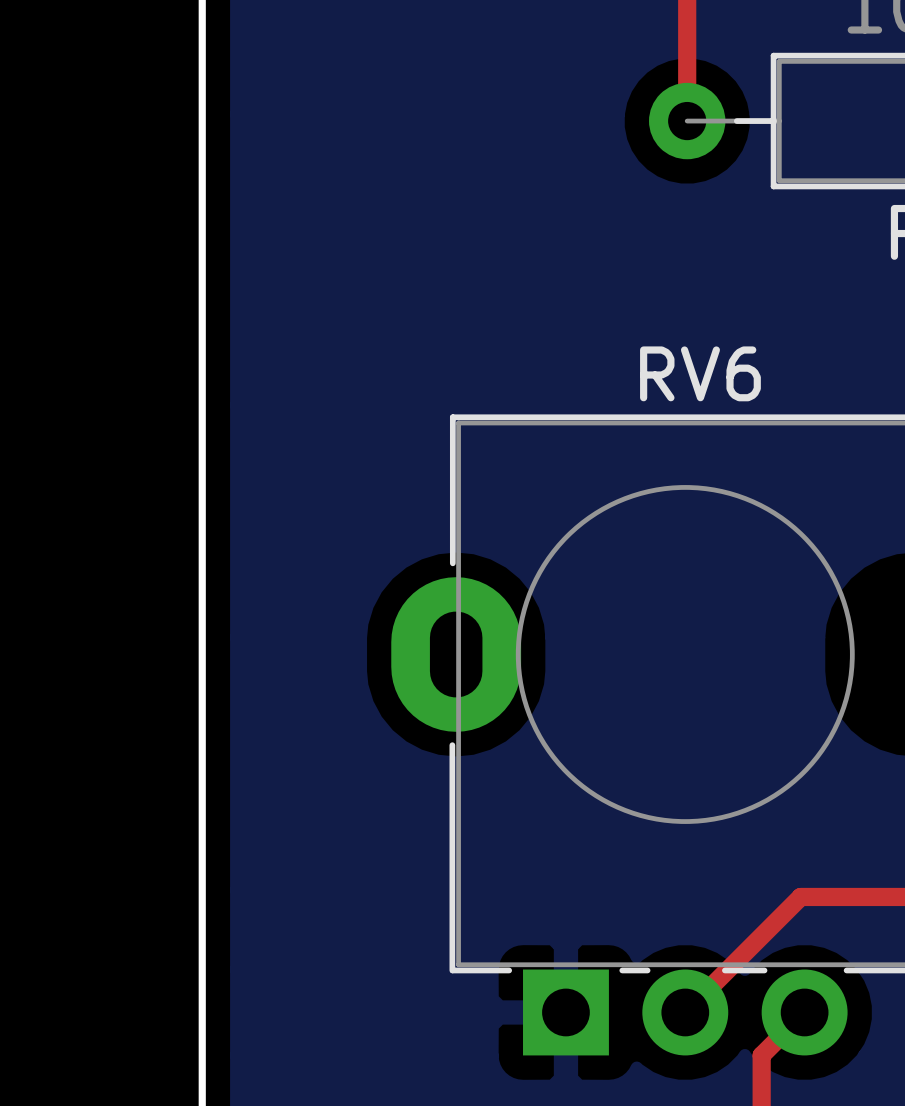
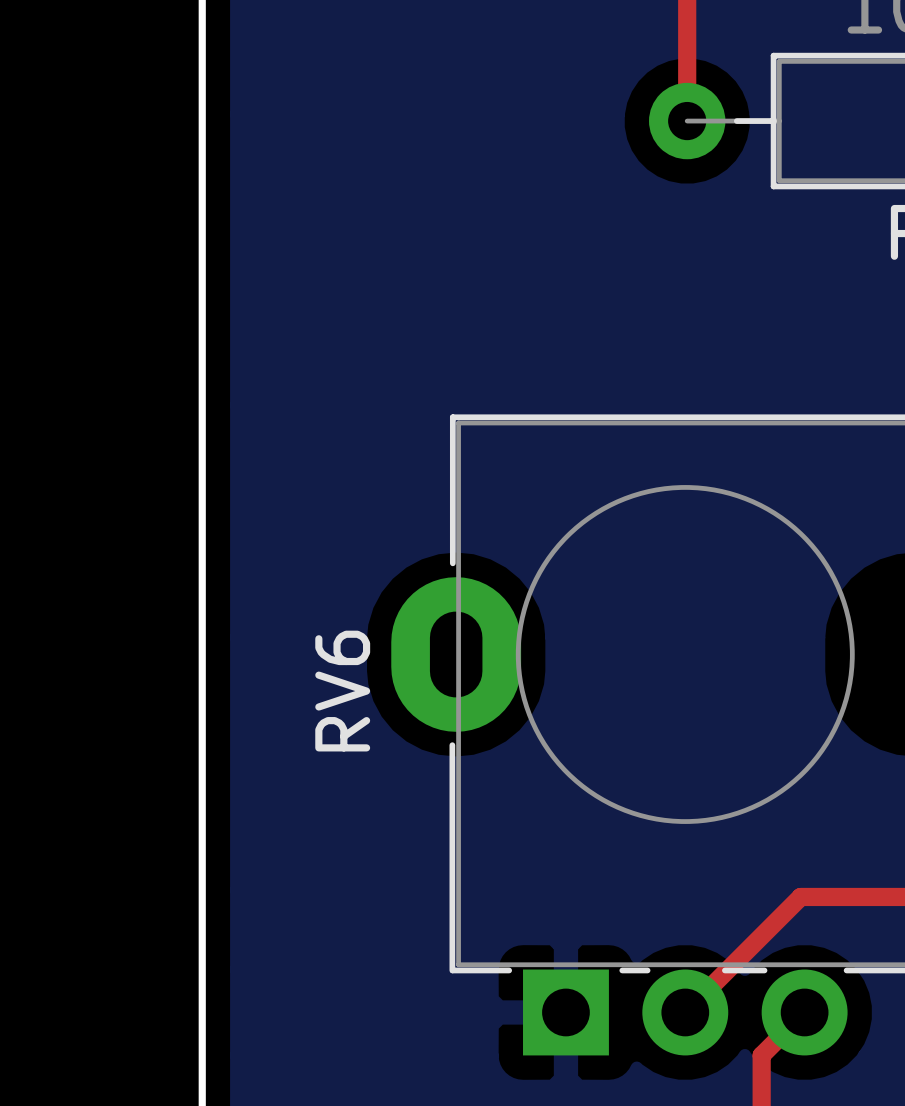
RV6 name rotation: 0° (700, 373) -> 90° counterclockwise (342, 691)
RV6 name position: RV6 (700, 373) -> RV6 (342, 691)

